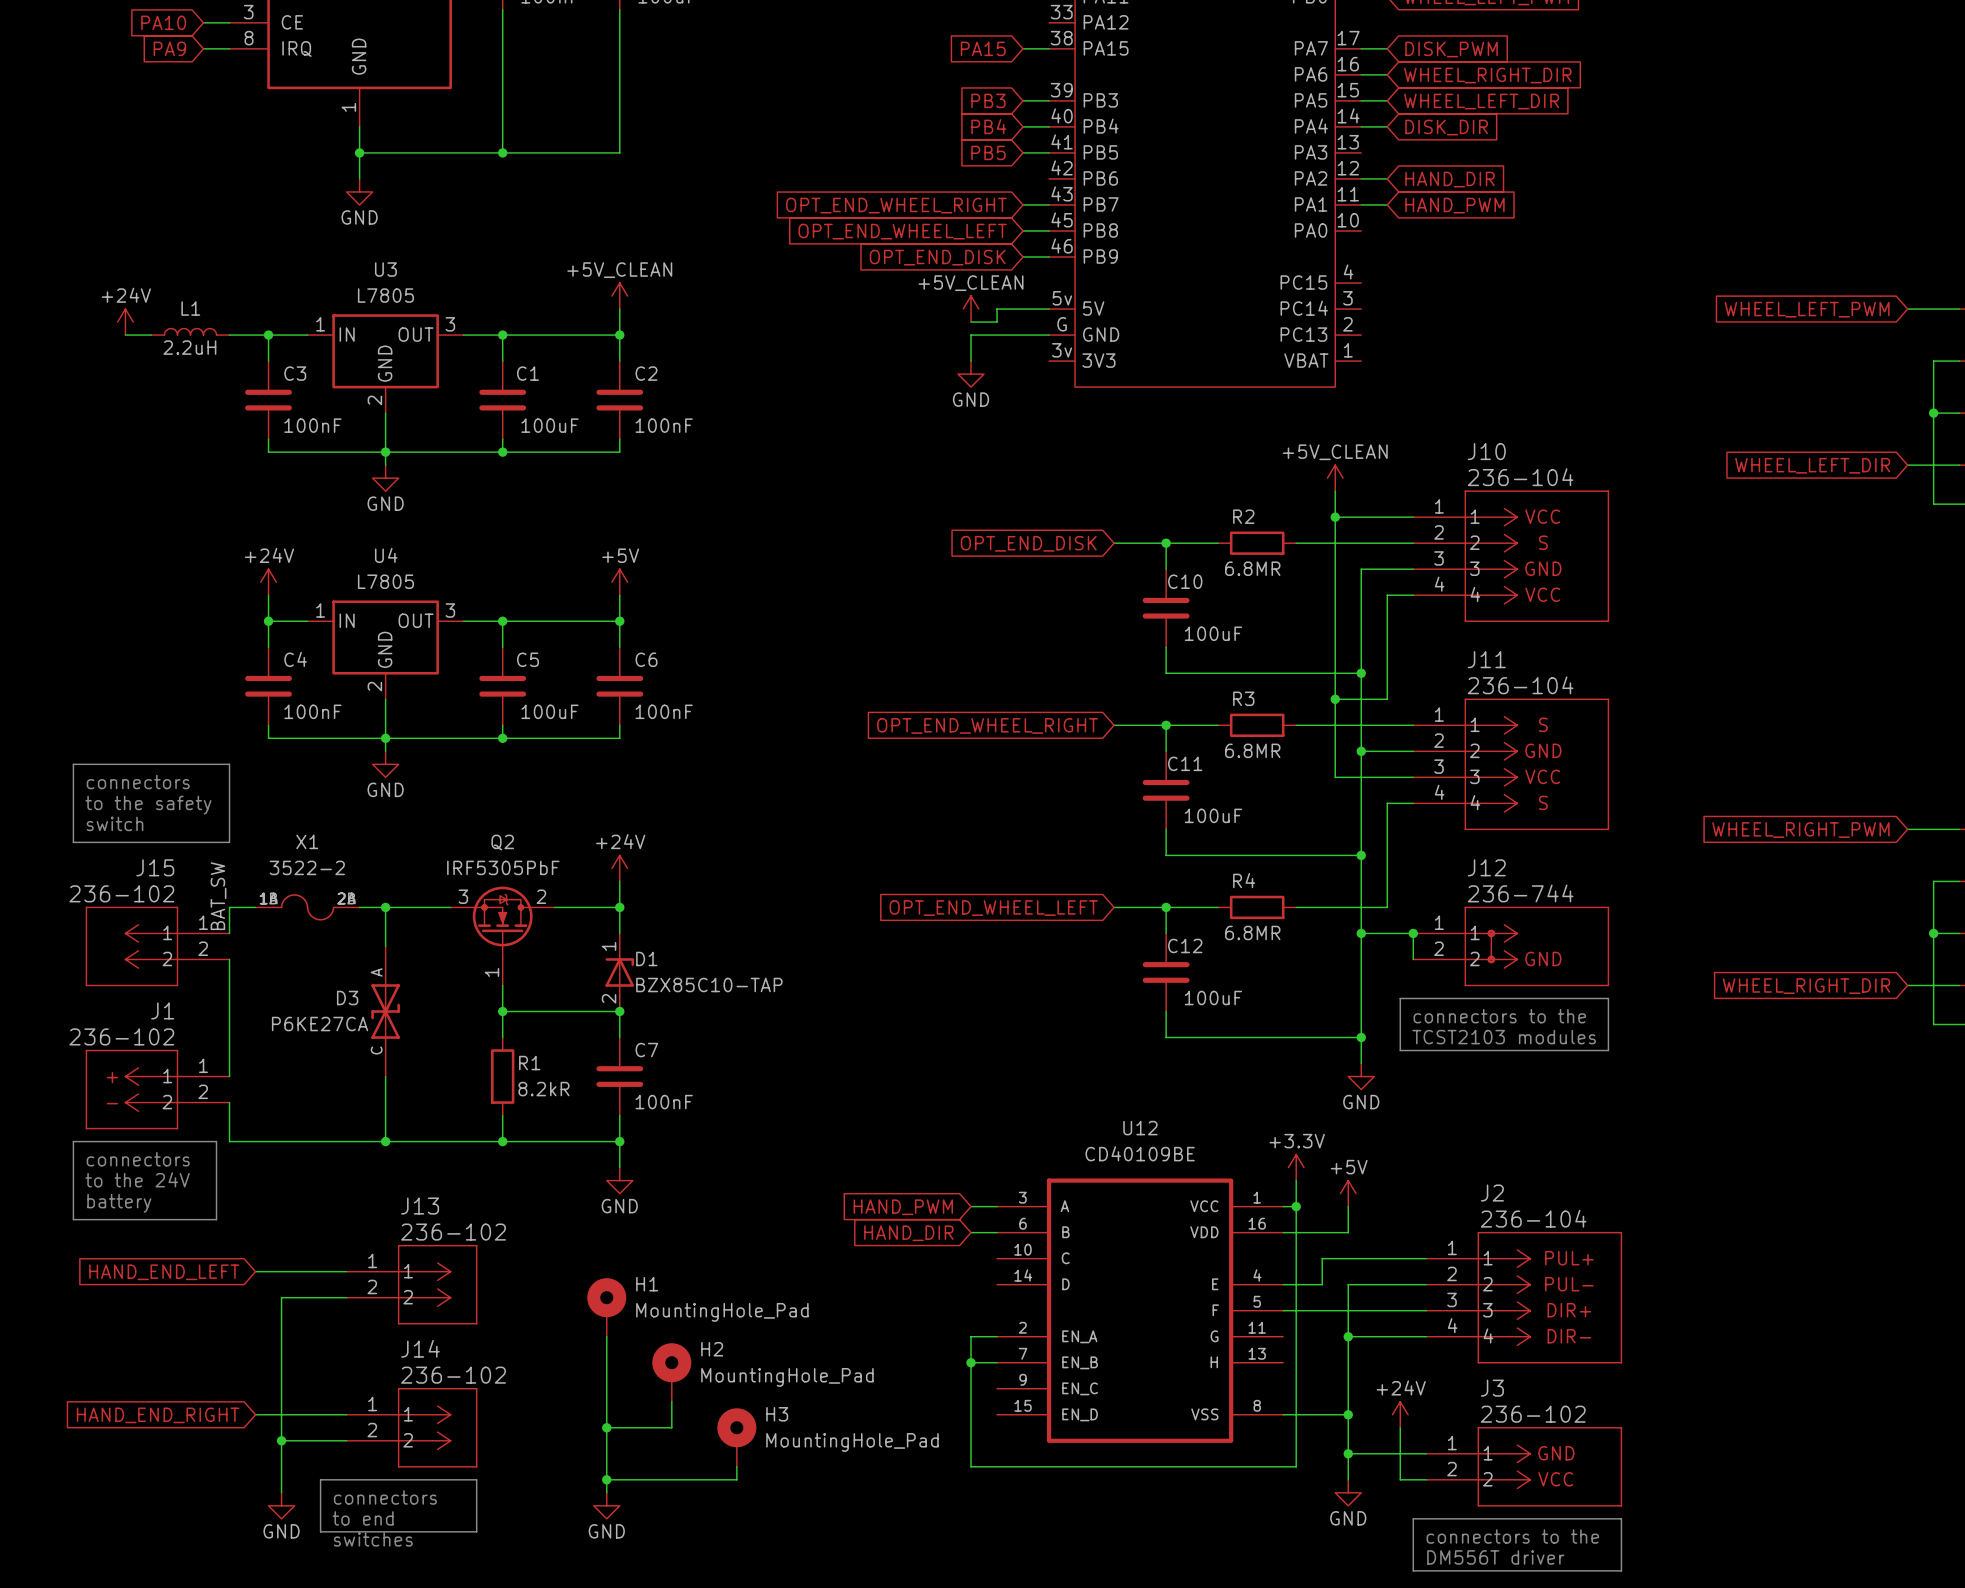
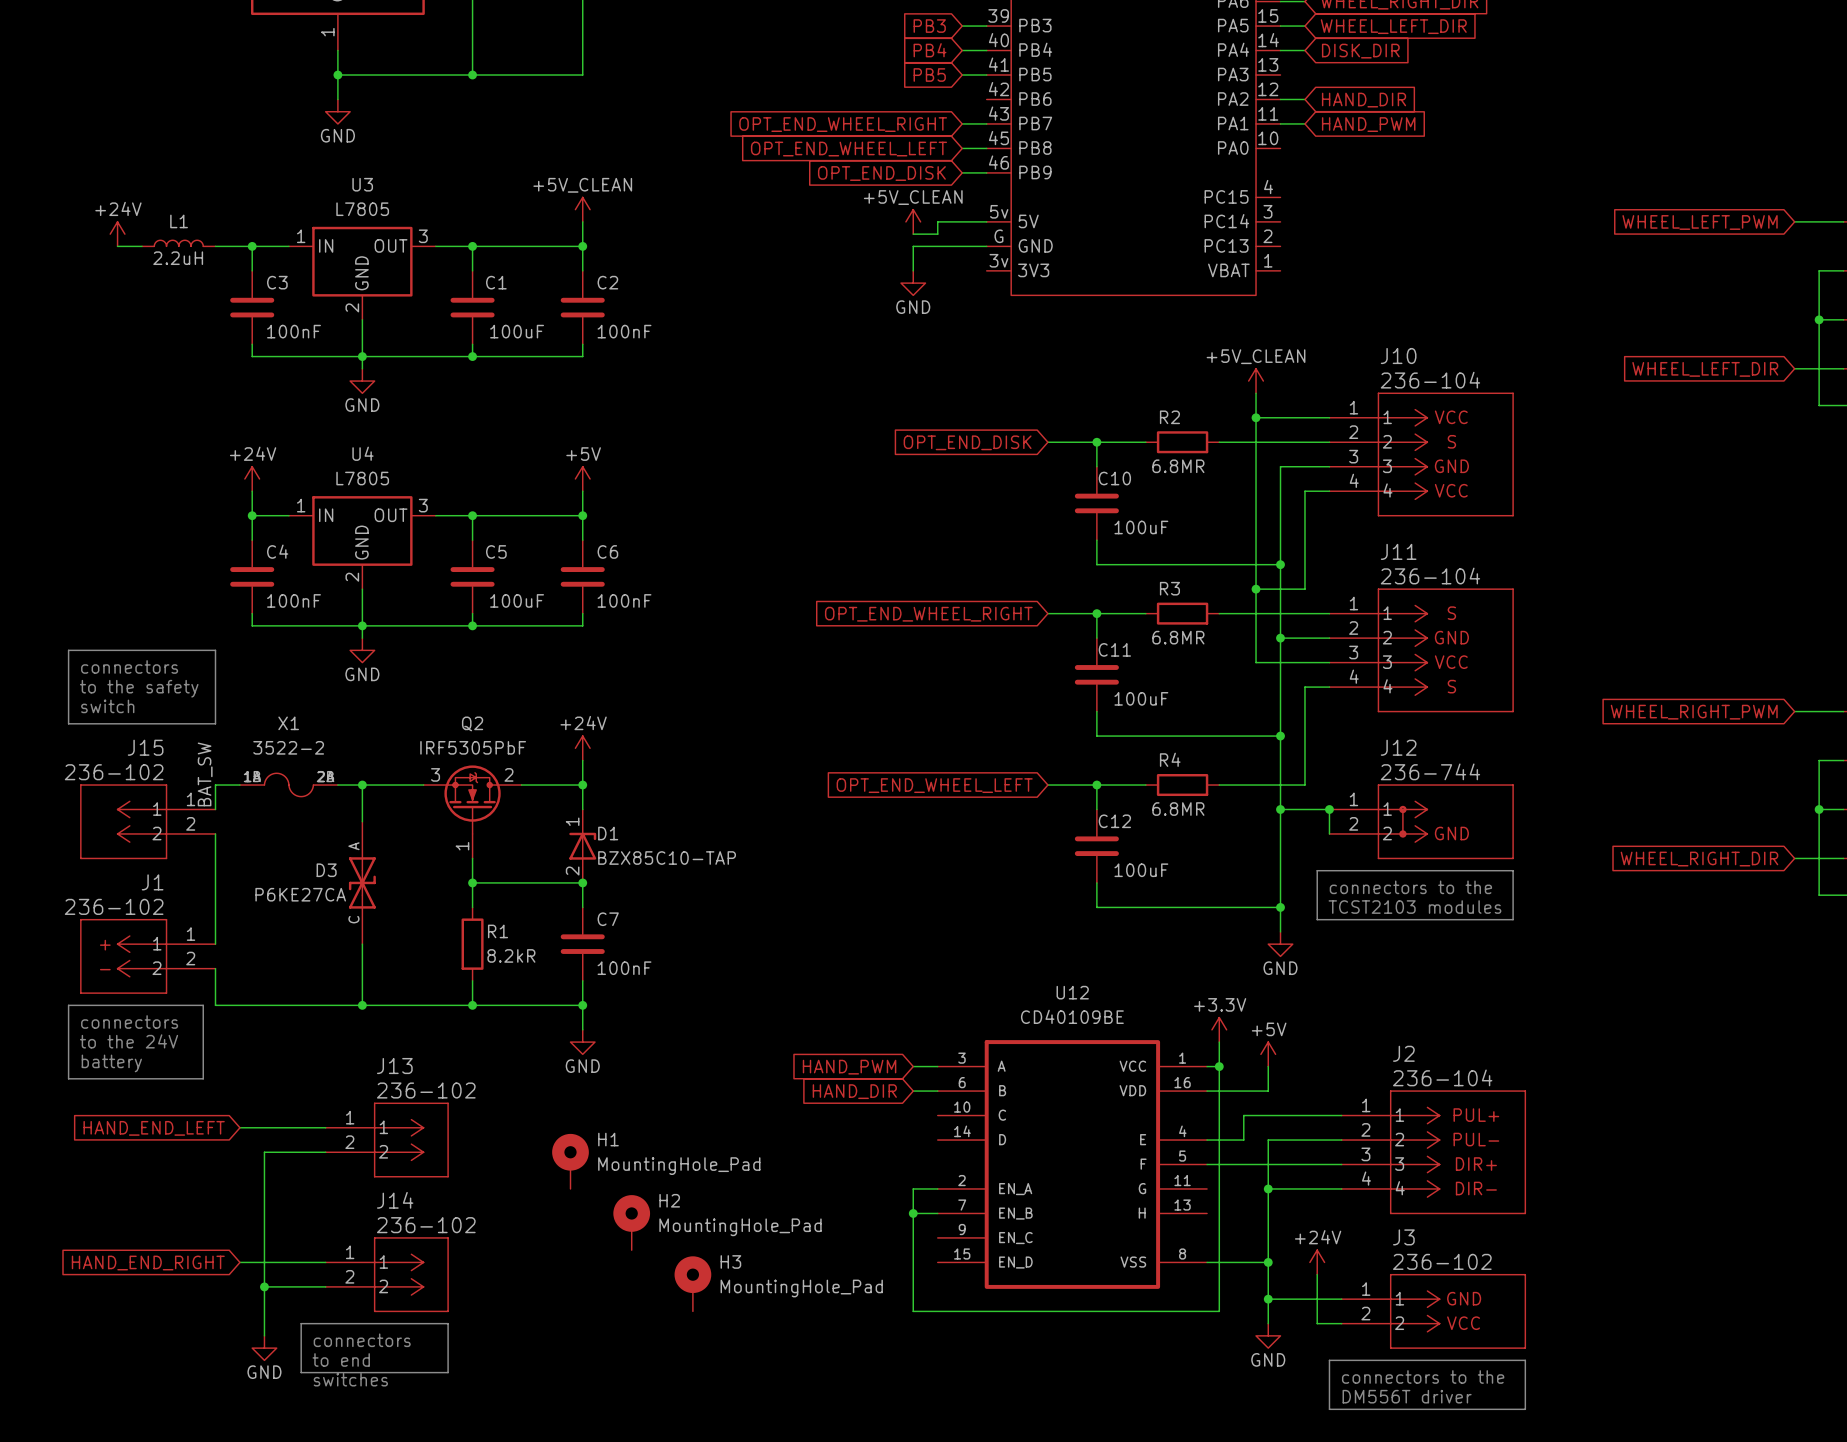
wire: (606, 1336) (606, 1492) -> none
wire: (671, 1401) (671, 1427) (606, 1427) -> none
junction: (606, 1427) -> none
wire: (736, 1466) (736, 1479) (606, 1479) -> none
junction: (606, 1479) -> none
power symbol: GND (606, 1505) -> none

